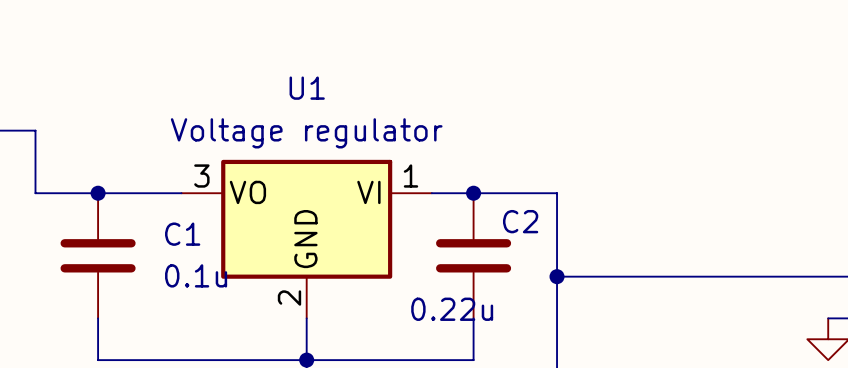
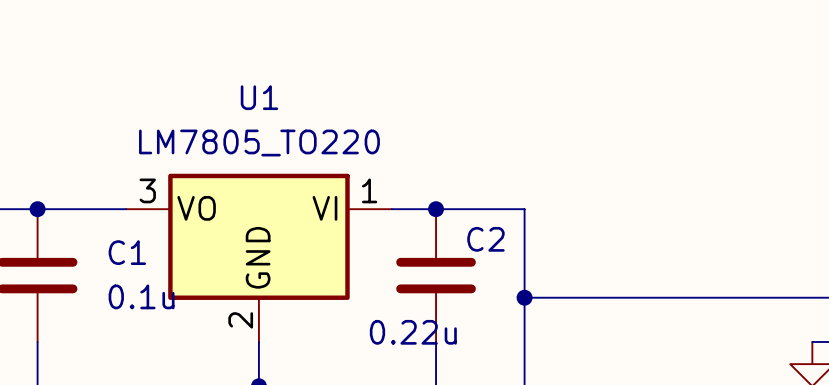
U1 value: Voltage regulator (306, 133) -> LM7805_TO220 (259, 143)

